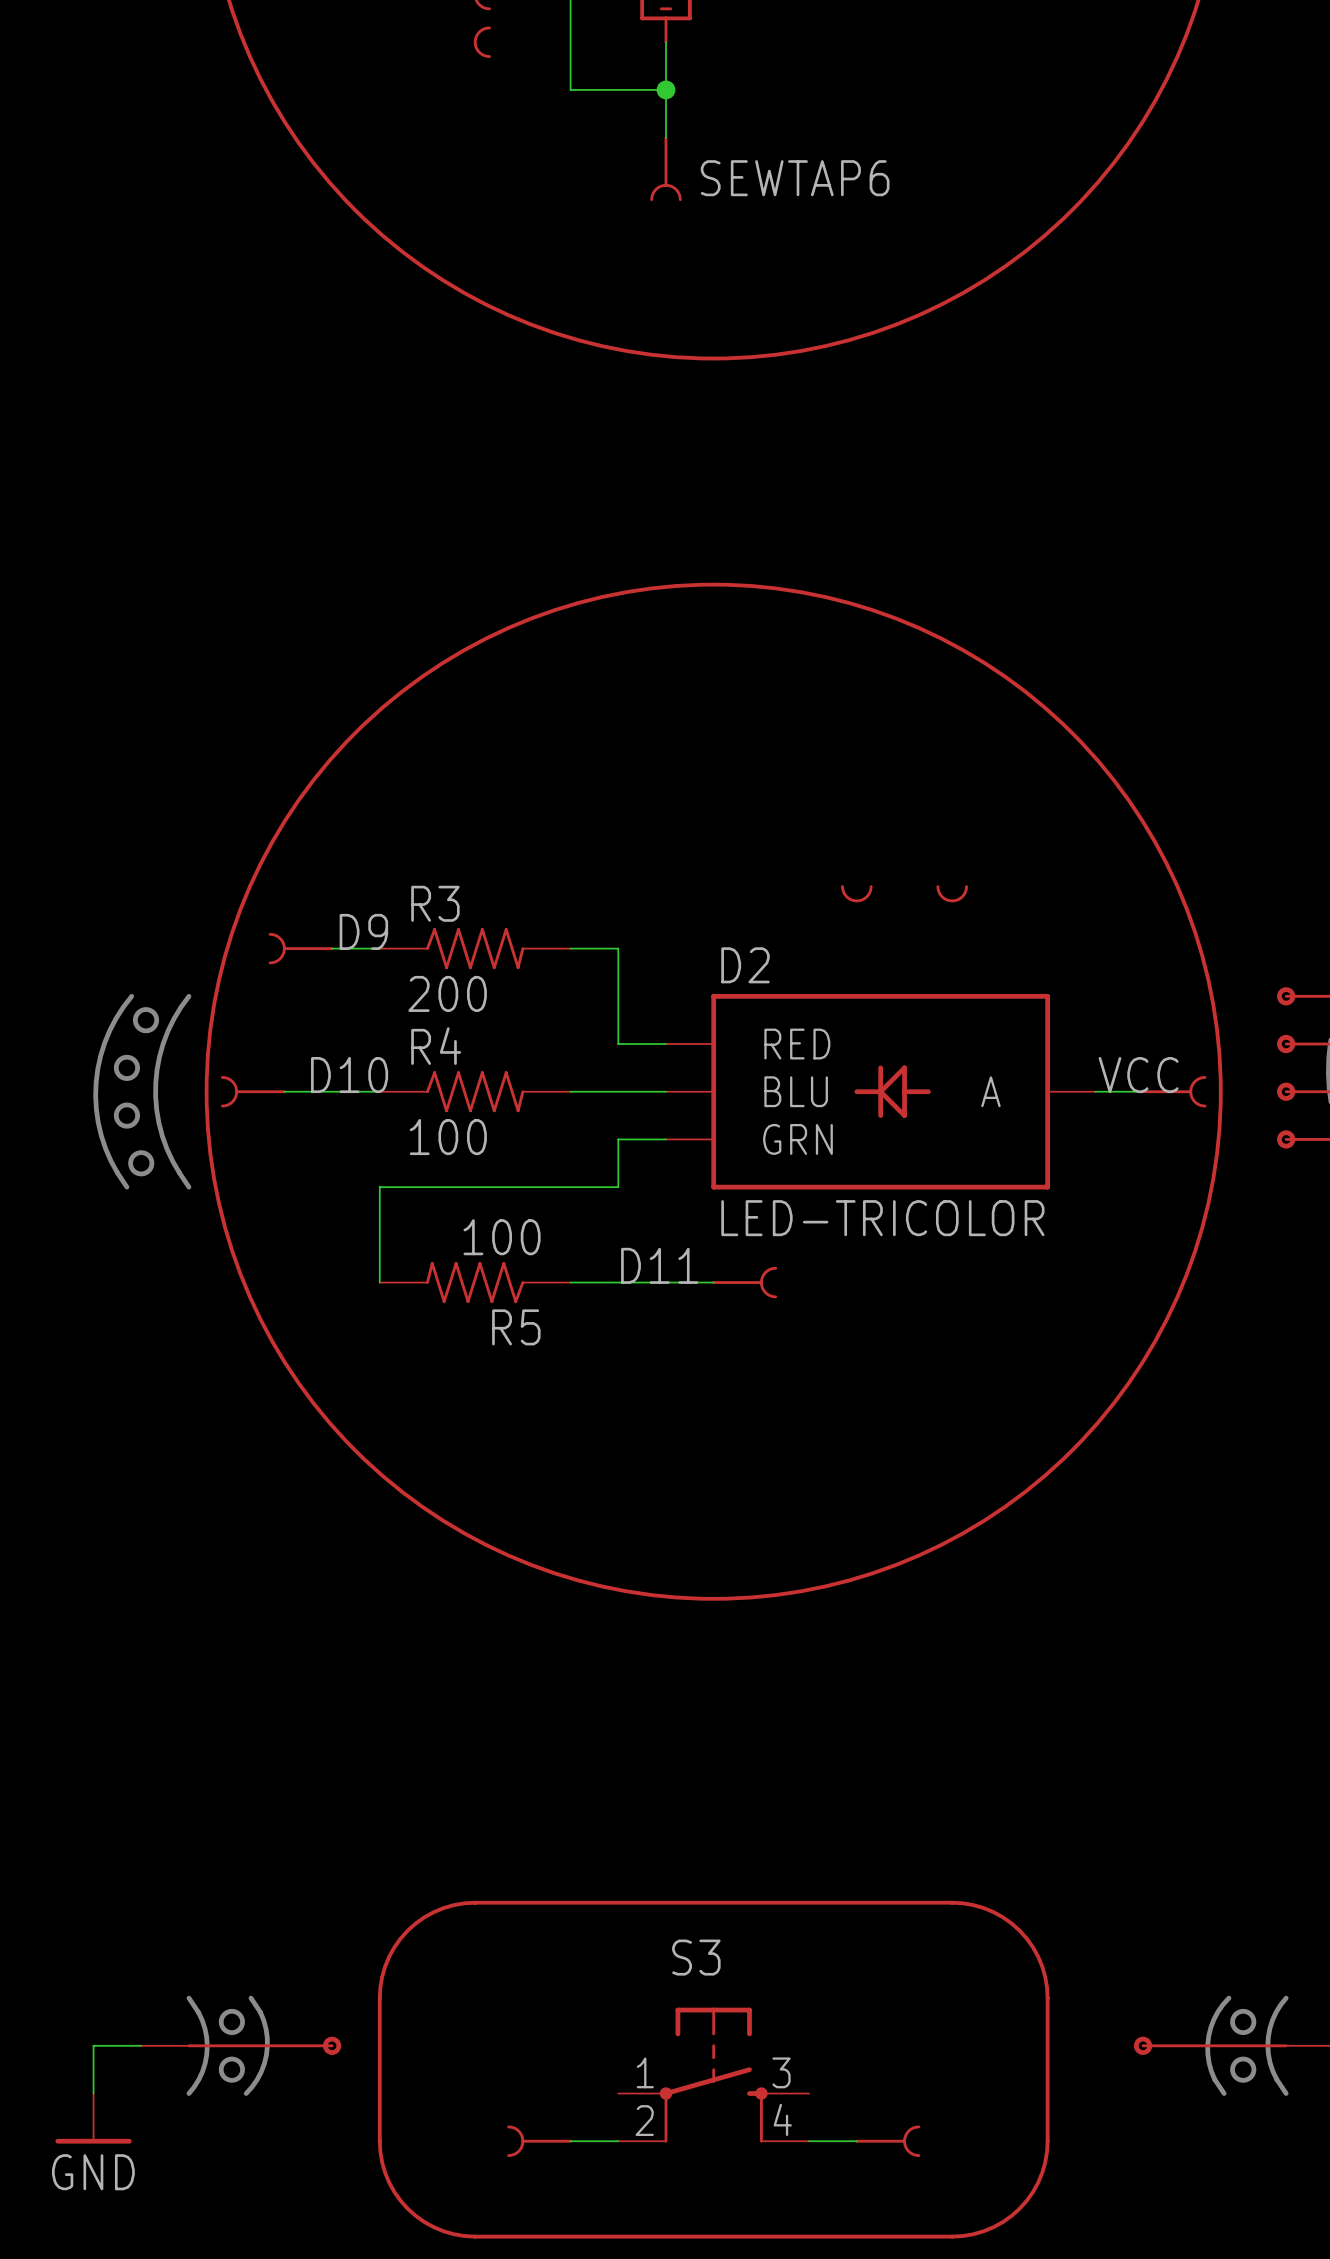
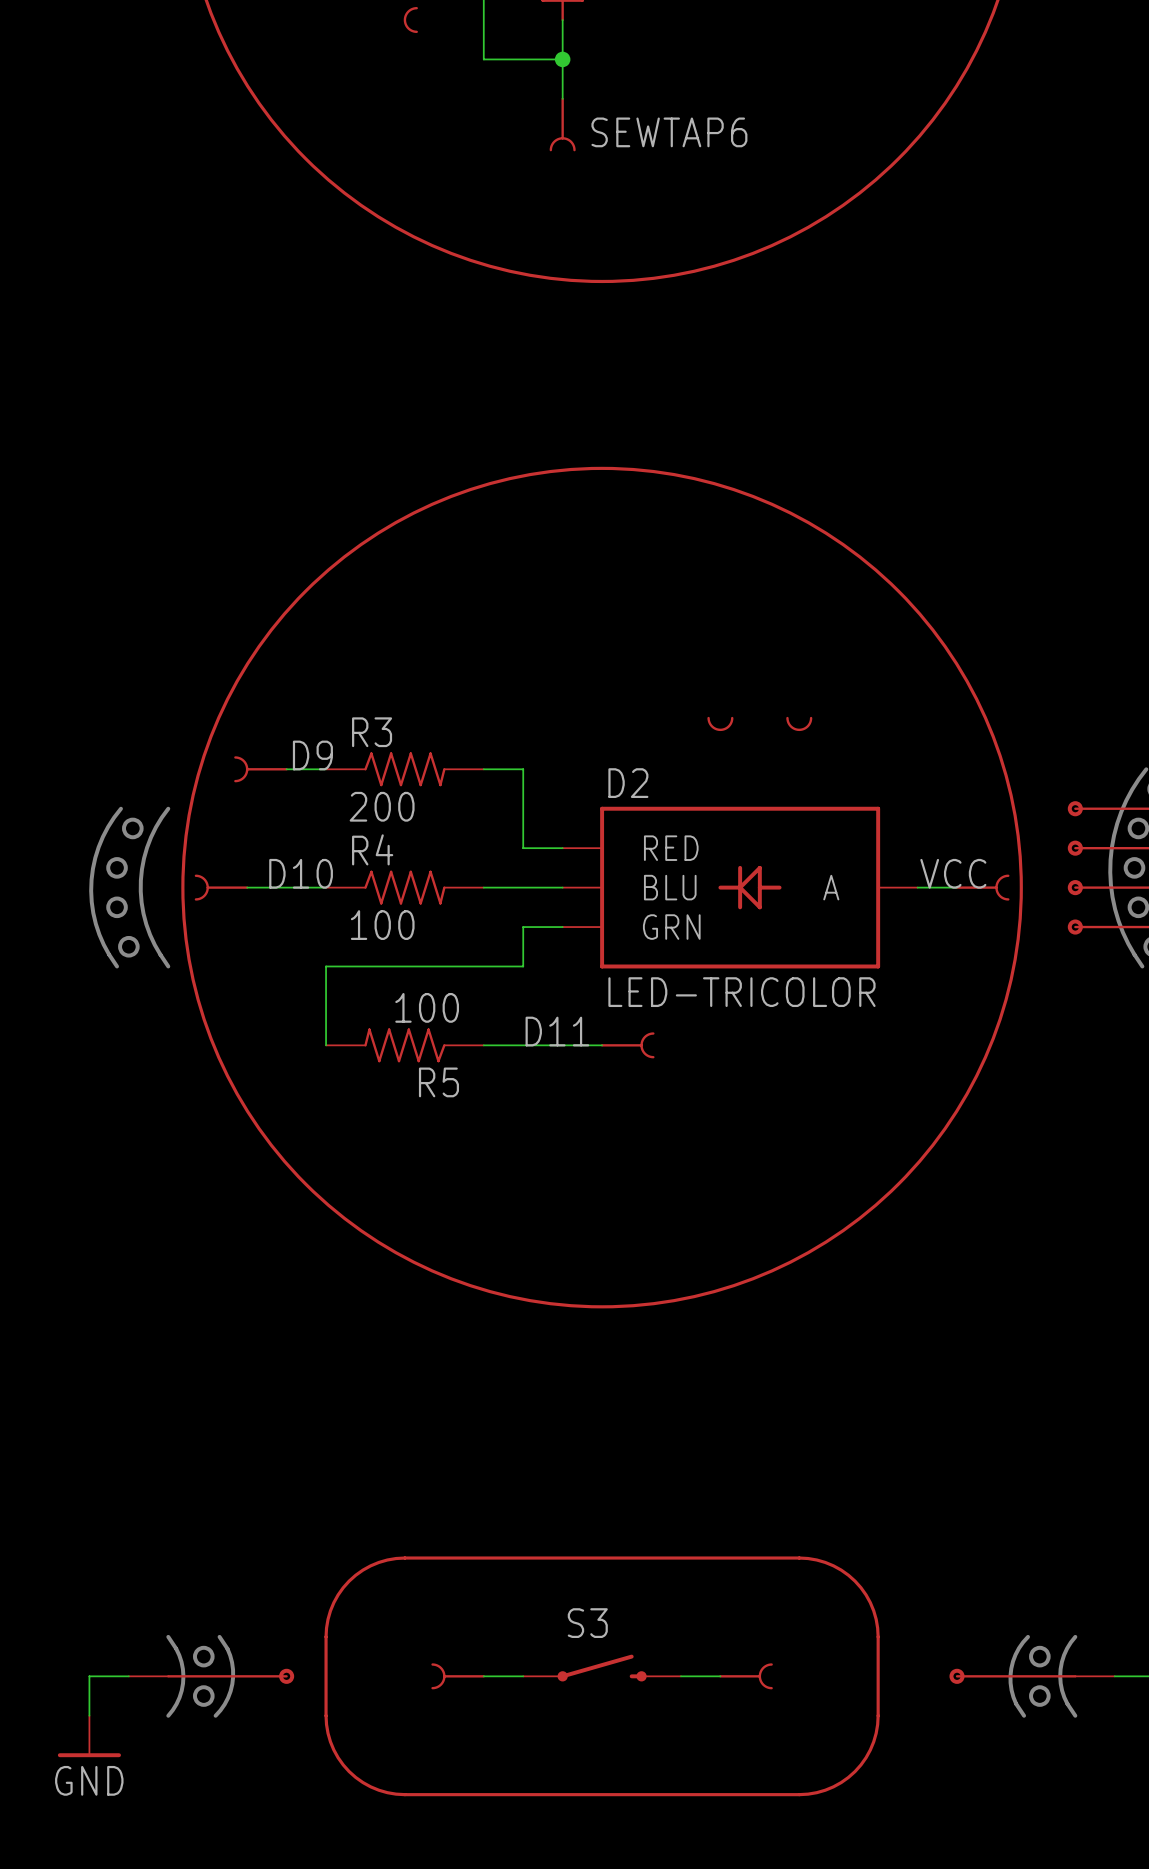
S3 name position: S3 (696, 1957) -> S3 (587, 1623)
S3 symbol: [618, 2007, 810, 2143] -> [523, 1654, 681, 1682]
line: (379, 2093) (380, 2151) (385, 2172) (394, 2191) (407, 2208) (424, 2222) (453, 2234) (475, 2236) (952, 2236) (973, 2234) (993, 2227) (1011, 2215) (1026, 2200) (1038, 2182) (1047, 2151) (1047, 2093) -> (326, 1715) (328, 1733) (333, 1749) (349, 1771) (370, 1786) (387, 1792) (404, 1794) (808, 1794) (833, 1786) (855, 1771) (870, 1749) (876, 1733) (878, 1715)
part position: (539, 2141) -> (458, 1676)
wire: (570, 2141) (618, 2141) -> (483, 1676) (523, 1676)
wire: (809, 2141) (856, 2141) -> (680, 1676) (720, 1676)
part position: (887, 2141) -> (746, 1676)

